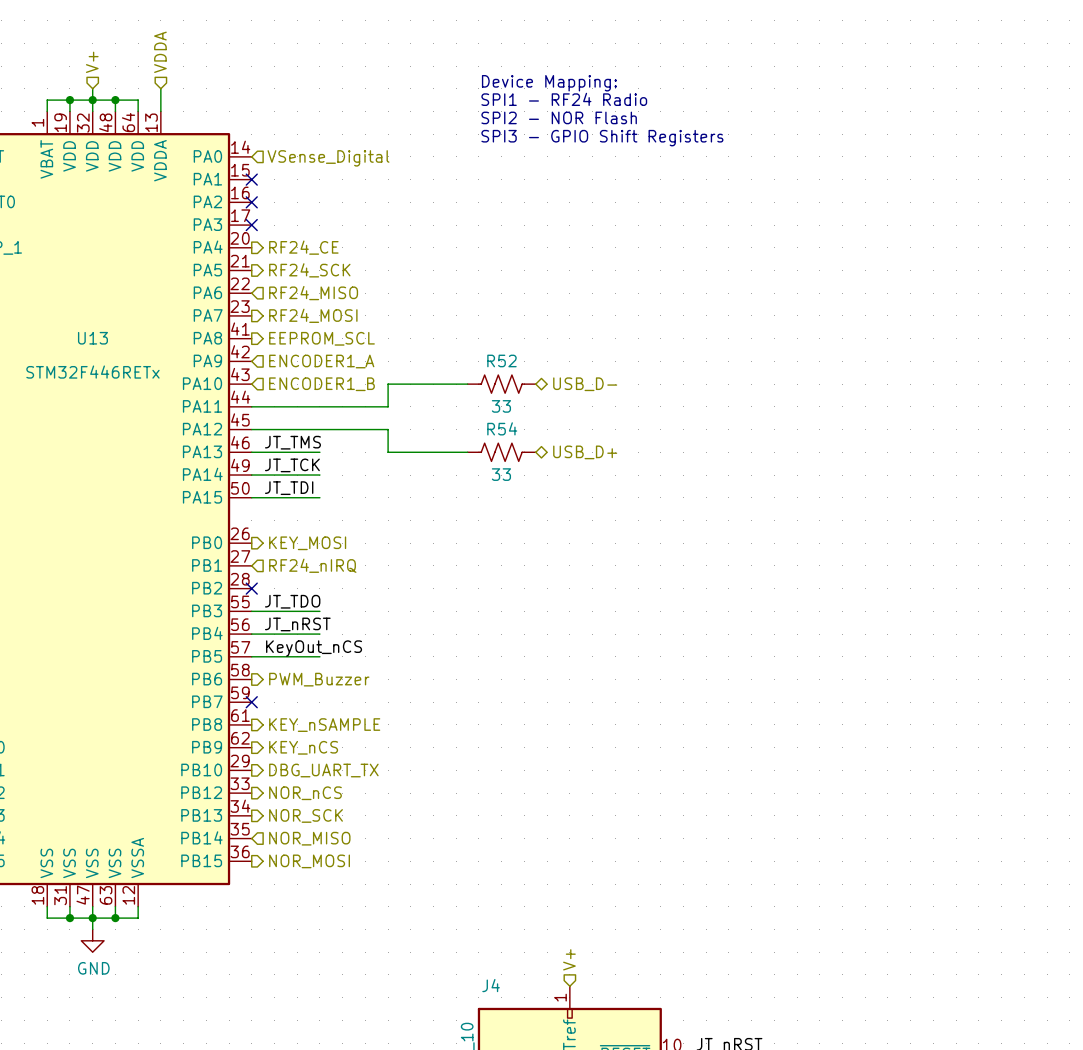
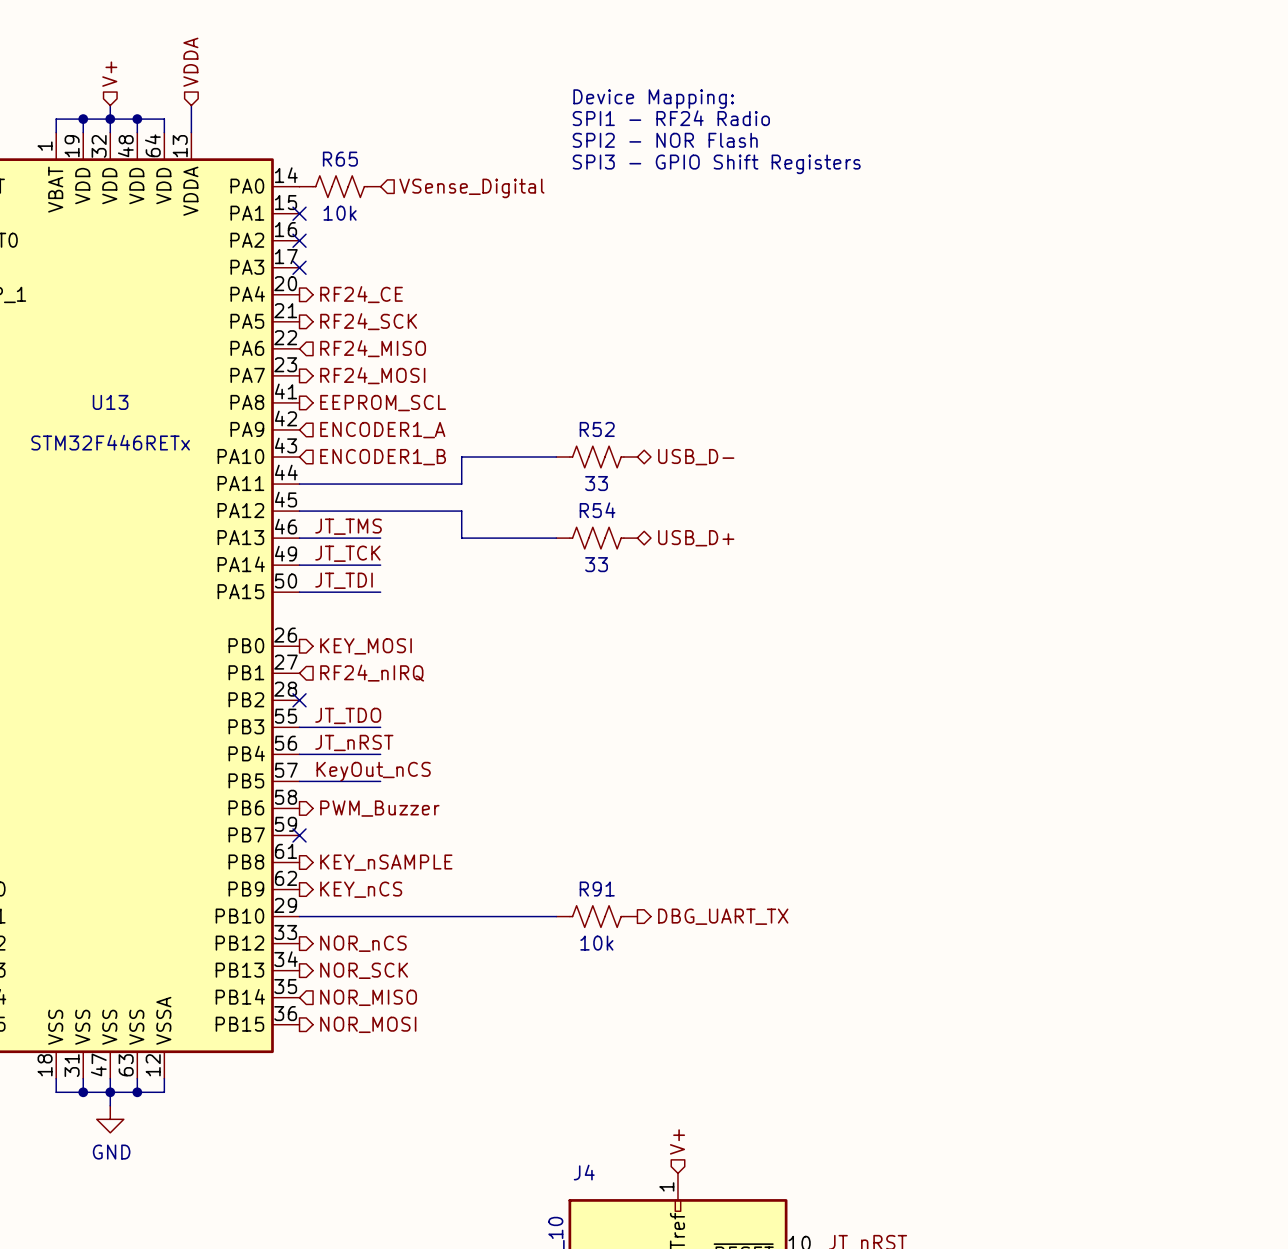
R65: none -> 10k (340, 186)
hierarchical label position: VSense_Digital (328, 158) -> VSense_Digital (471, 188)
wire: none -> (299, 916) (556, 916)
hierarchical label: DBG_UART_TX (323, 770) -> none
R91: none -> 10k (596, 916)
hierarchical label: none -> DBG_UART_TX (723, 916)

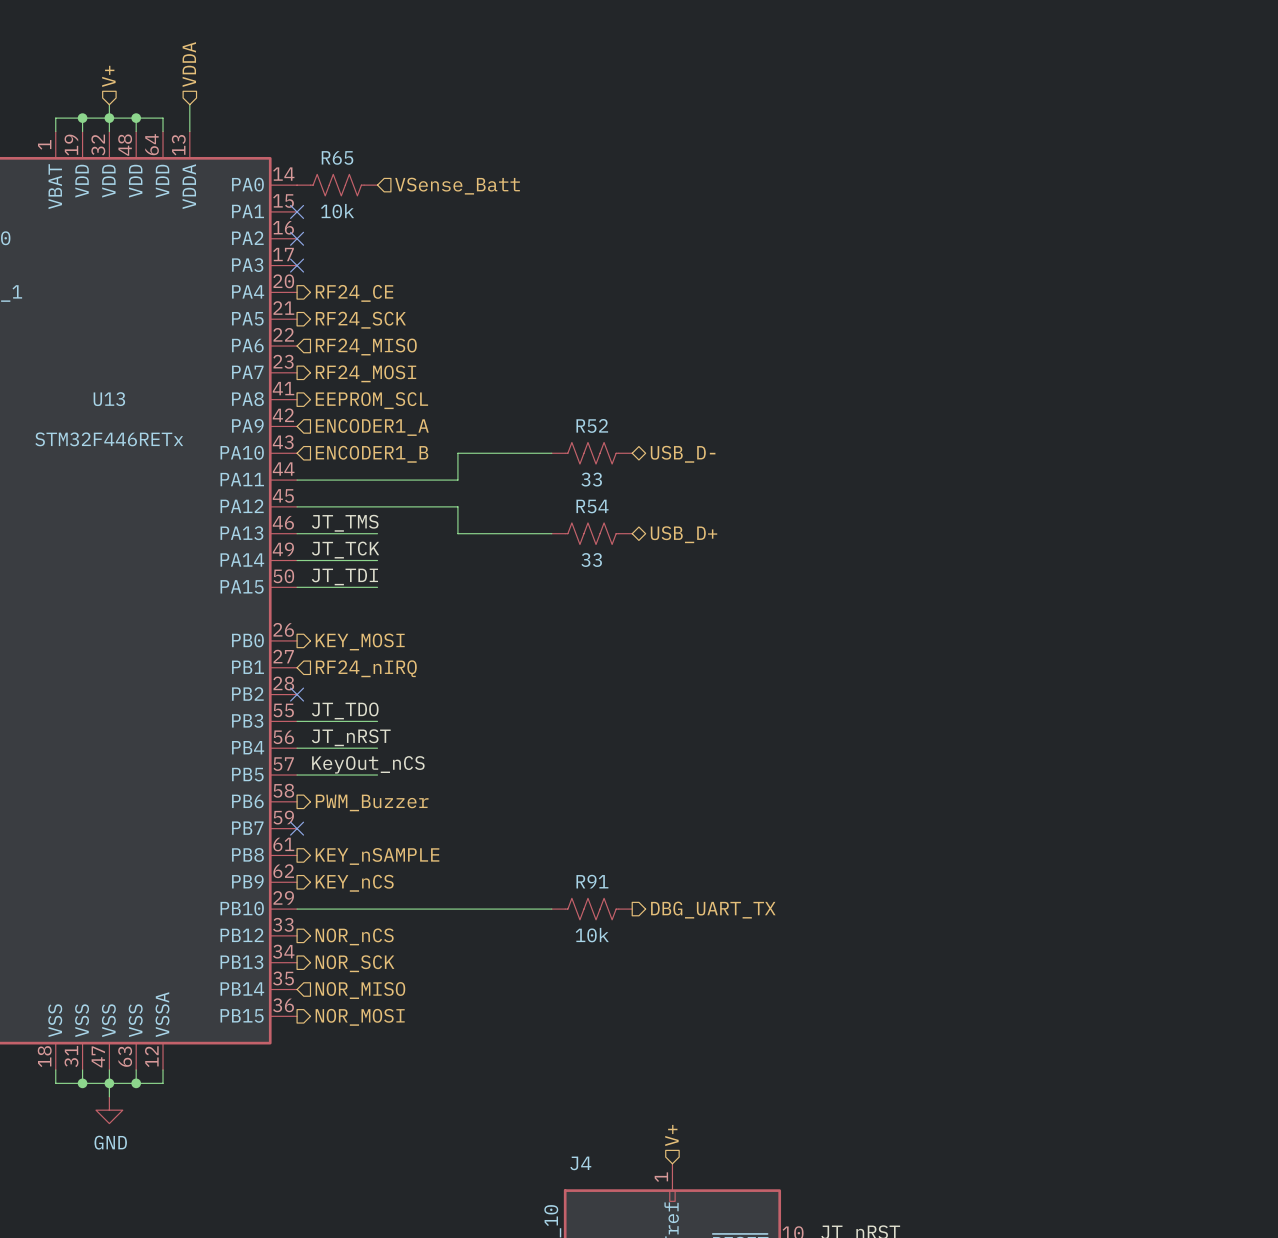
text: Device Mapping: (653, 99) -> none
text: SPI1 - RF24 Radio (671, 118) -> none
text: SPI2 - NOR Flash (665, 140) -> none
text: SPI3 - GPIO Shift Registers (716, 164) -> none
hierarchical label: VSense_Digital (471, 188) -> VSense_Batt (457, 186)

